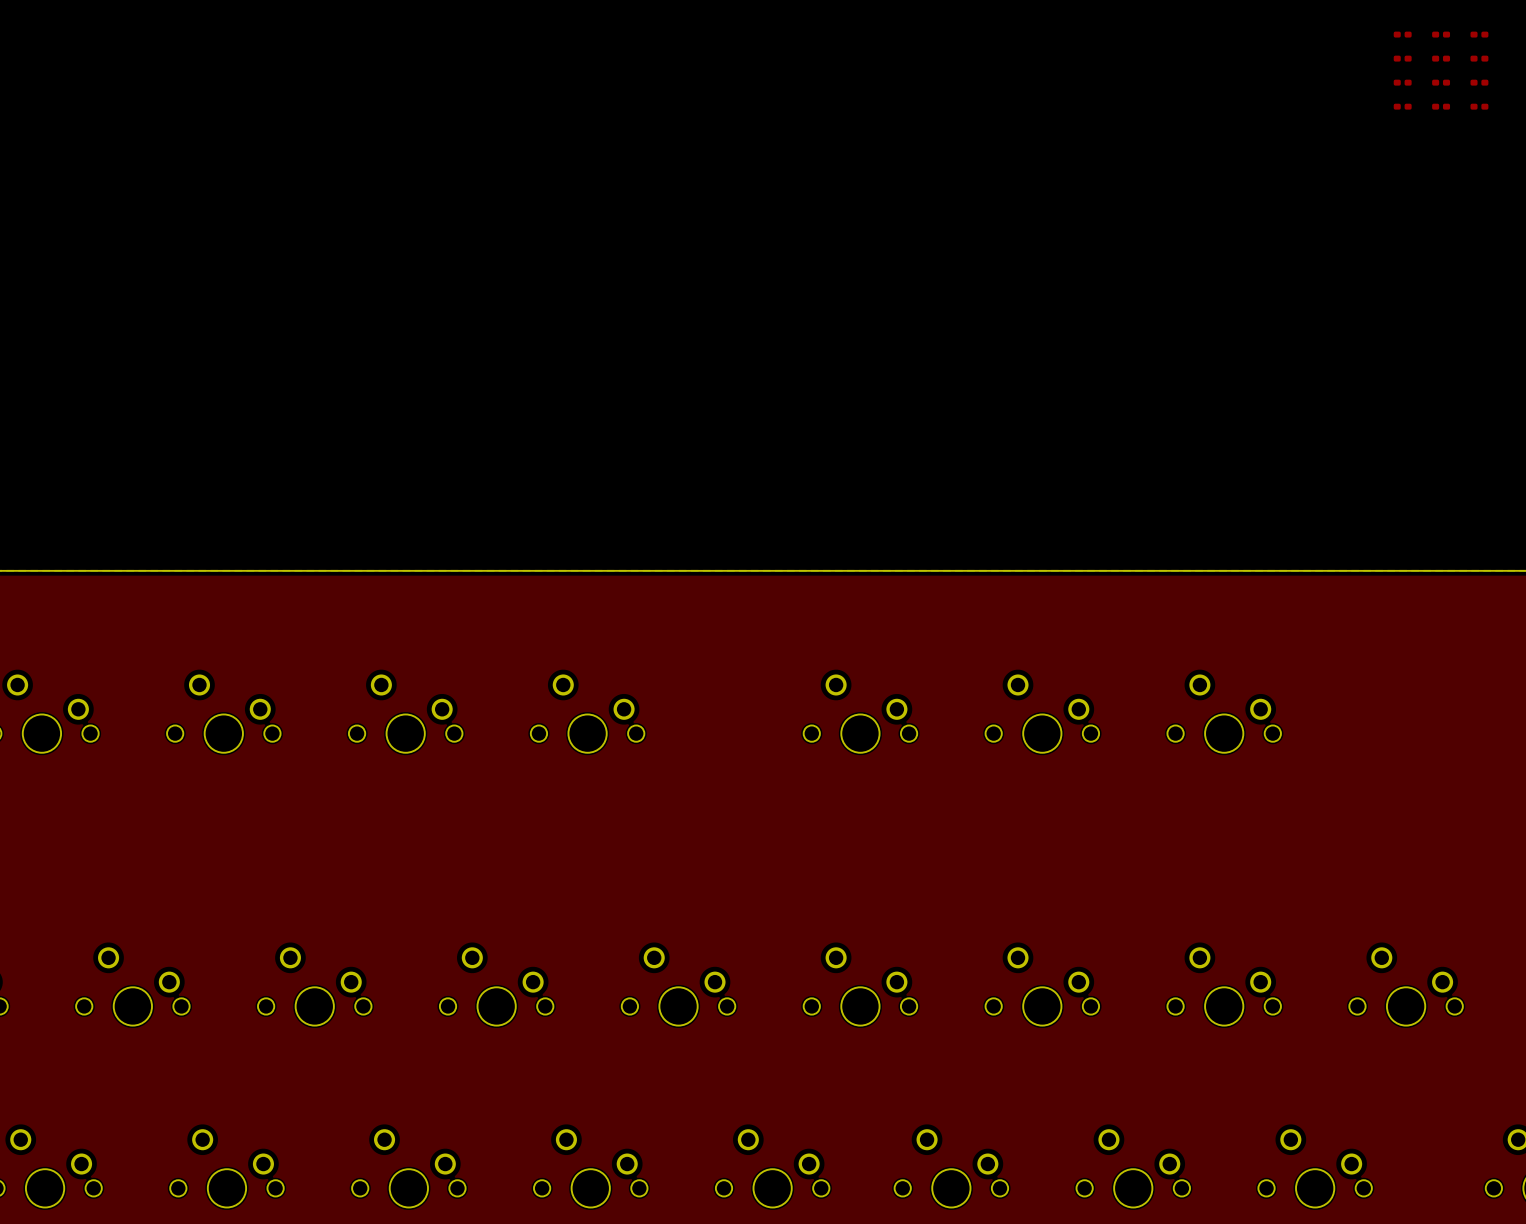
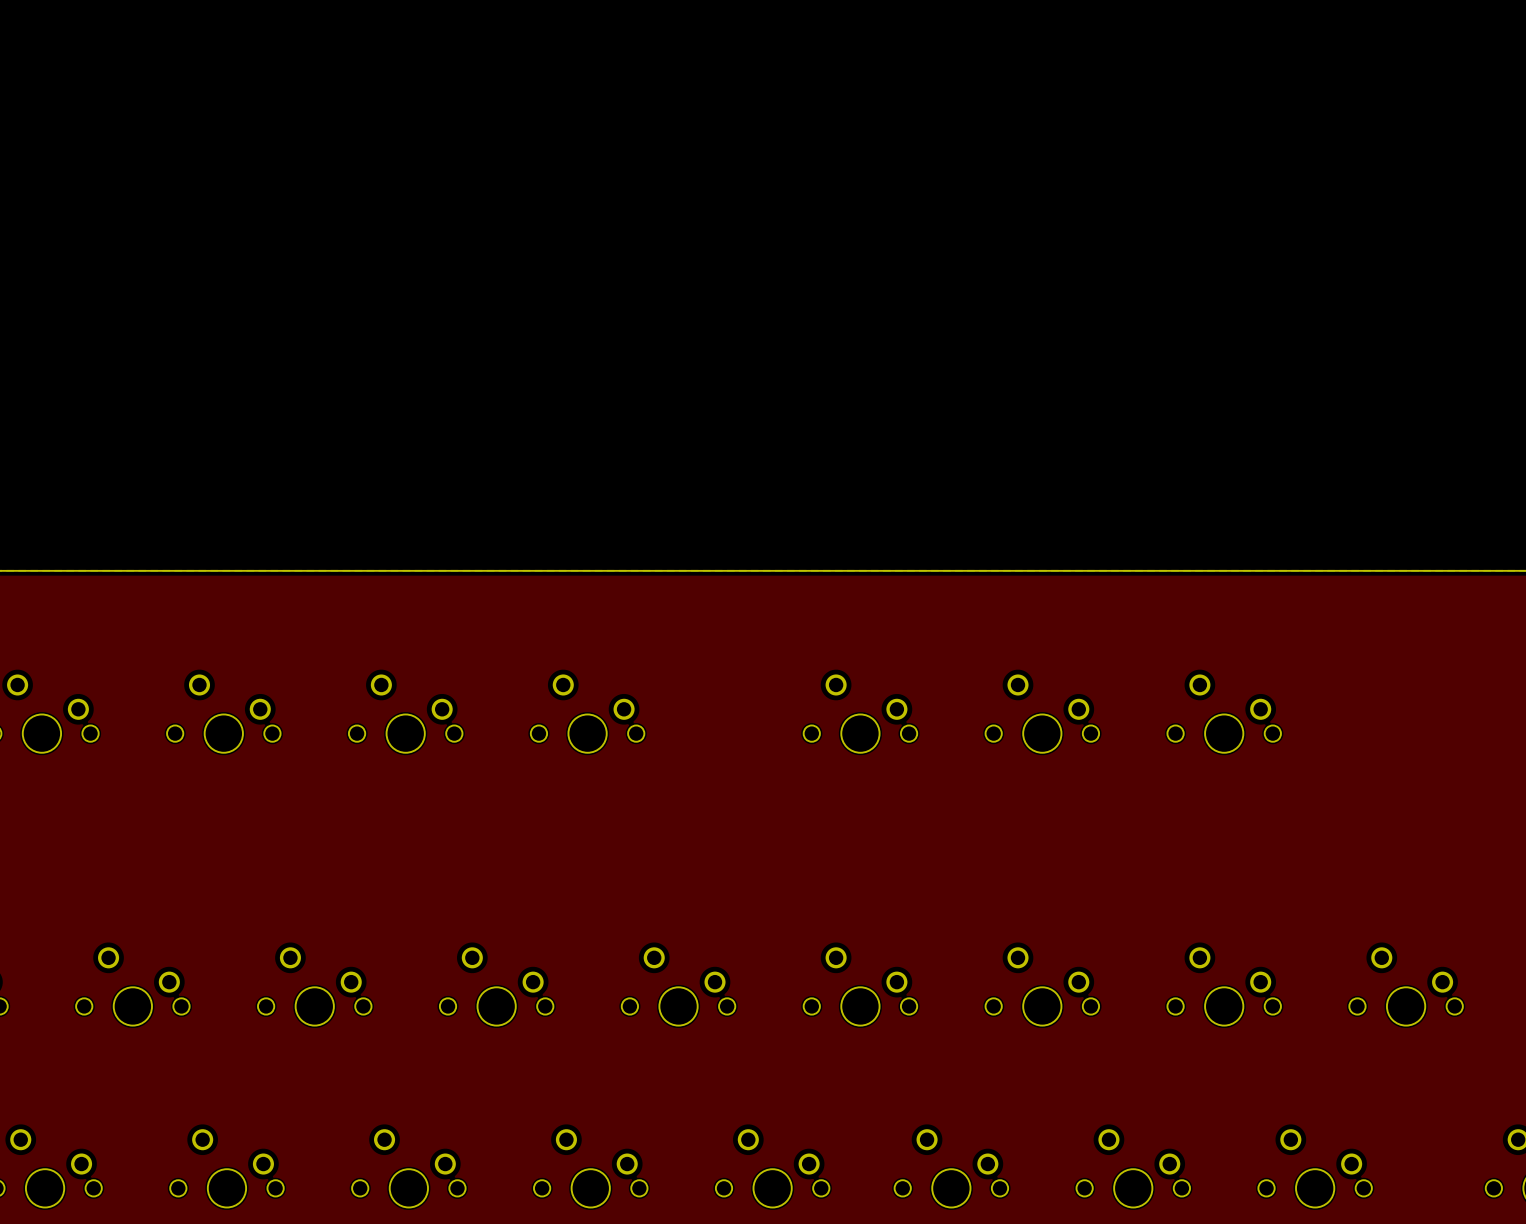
part: (1402, 34) -> none
part: (1441, 34) -> none
part: (1479, 34) -> none
part: (1402, 58) -> none
part: (1441, 58) -> none
part: (1479, 58) -> none
part: (1402, 82) -> none
part: (1441, 82) -> none
part: (1479, 82) -> none
part: (1402, 106) -> none
part: (1441, 106) -> none
part: (1479, 106) -> none

